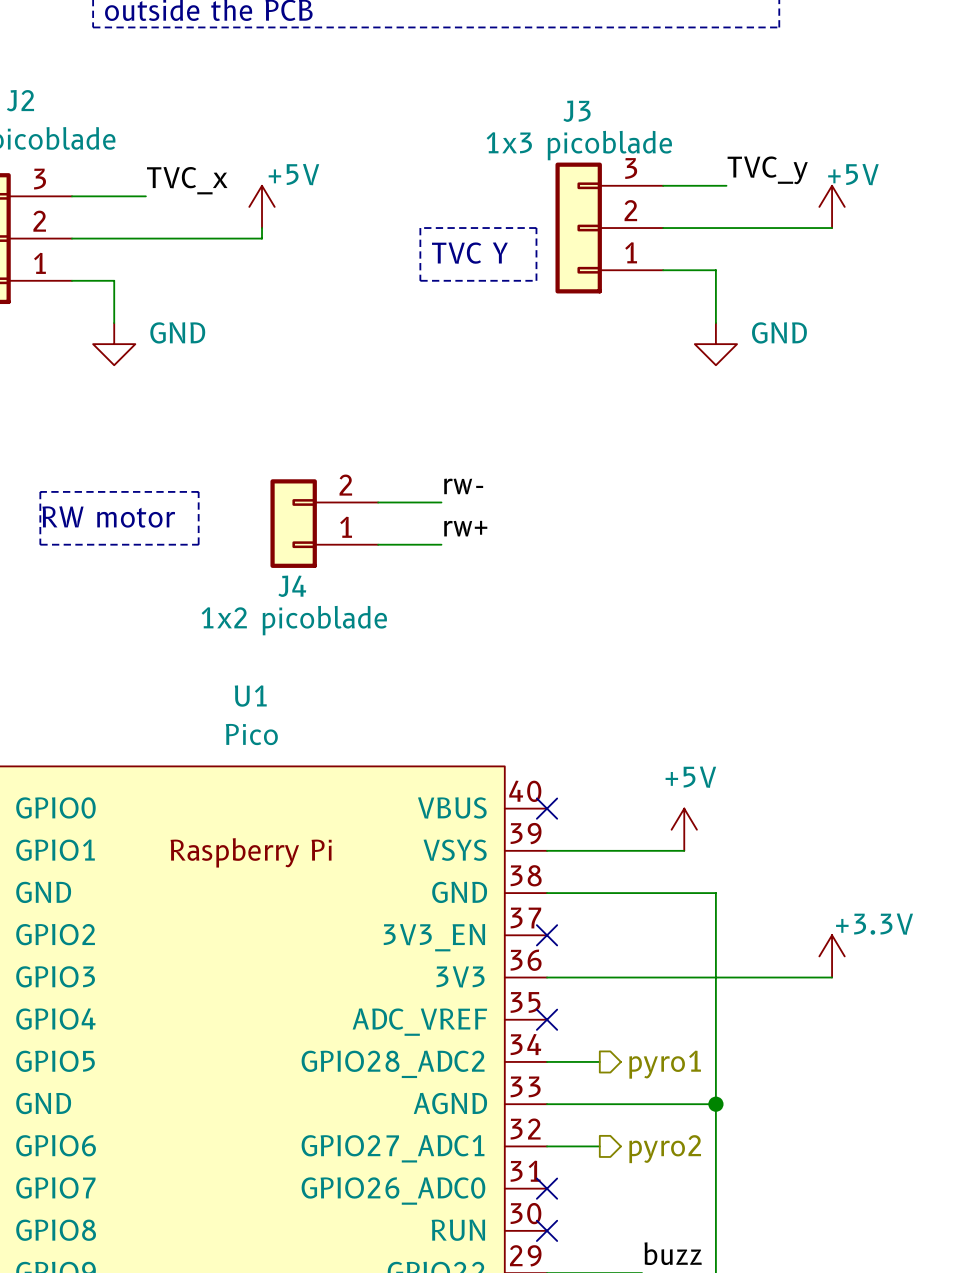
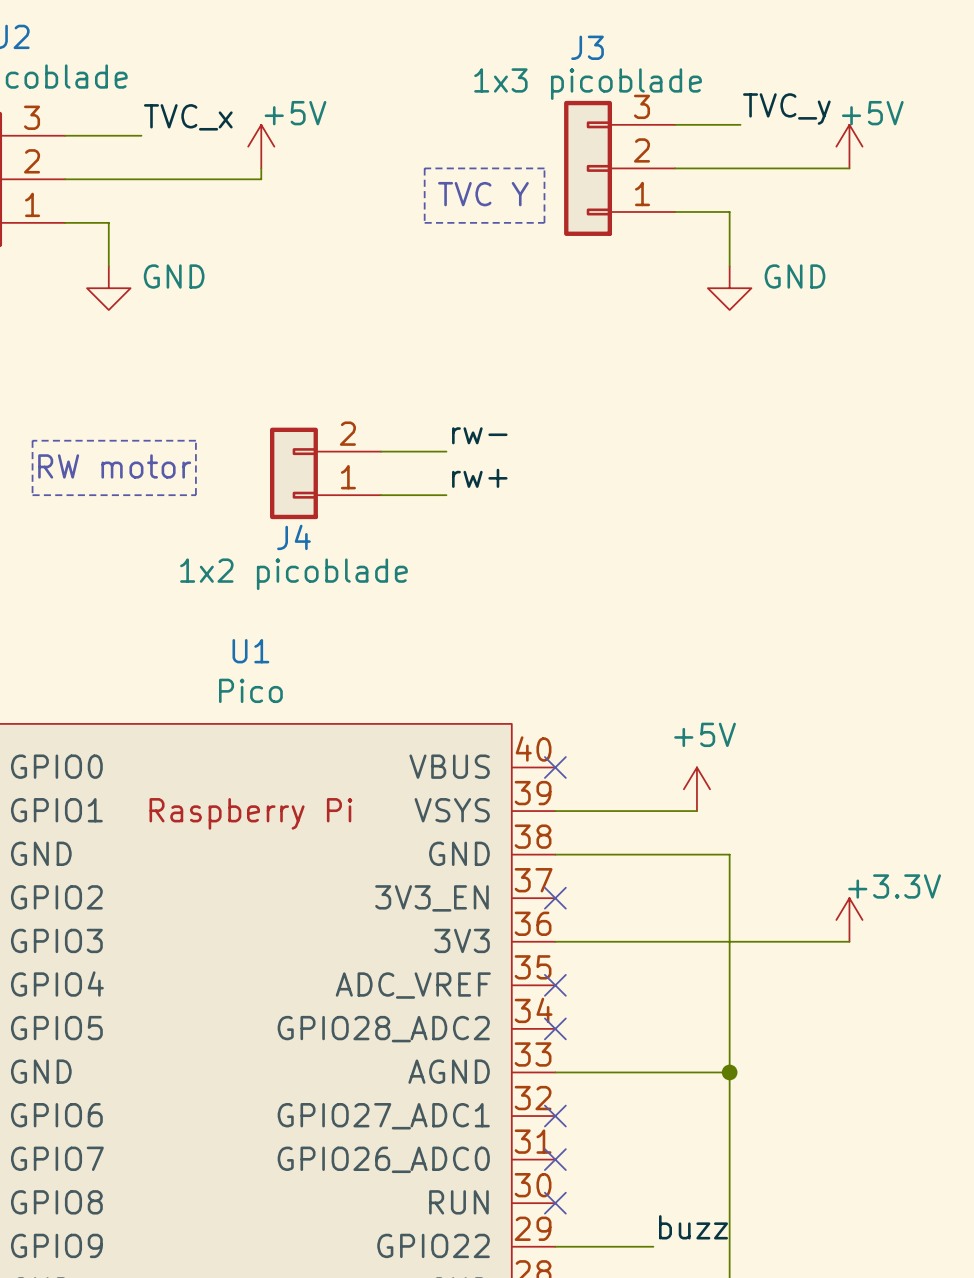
wire: (547, 1061) (599, 1061) -> none
no-connect mark: none -> (555, 1028)
hierarchical label: pyro1 (665, 1064) -> none
wire: (547, 1146) (599, 1146) -> none
no-connect mark: none -> (555, 1116)
hierarchical label: pyro2 (665, 1149) -> none

